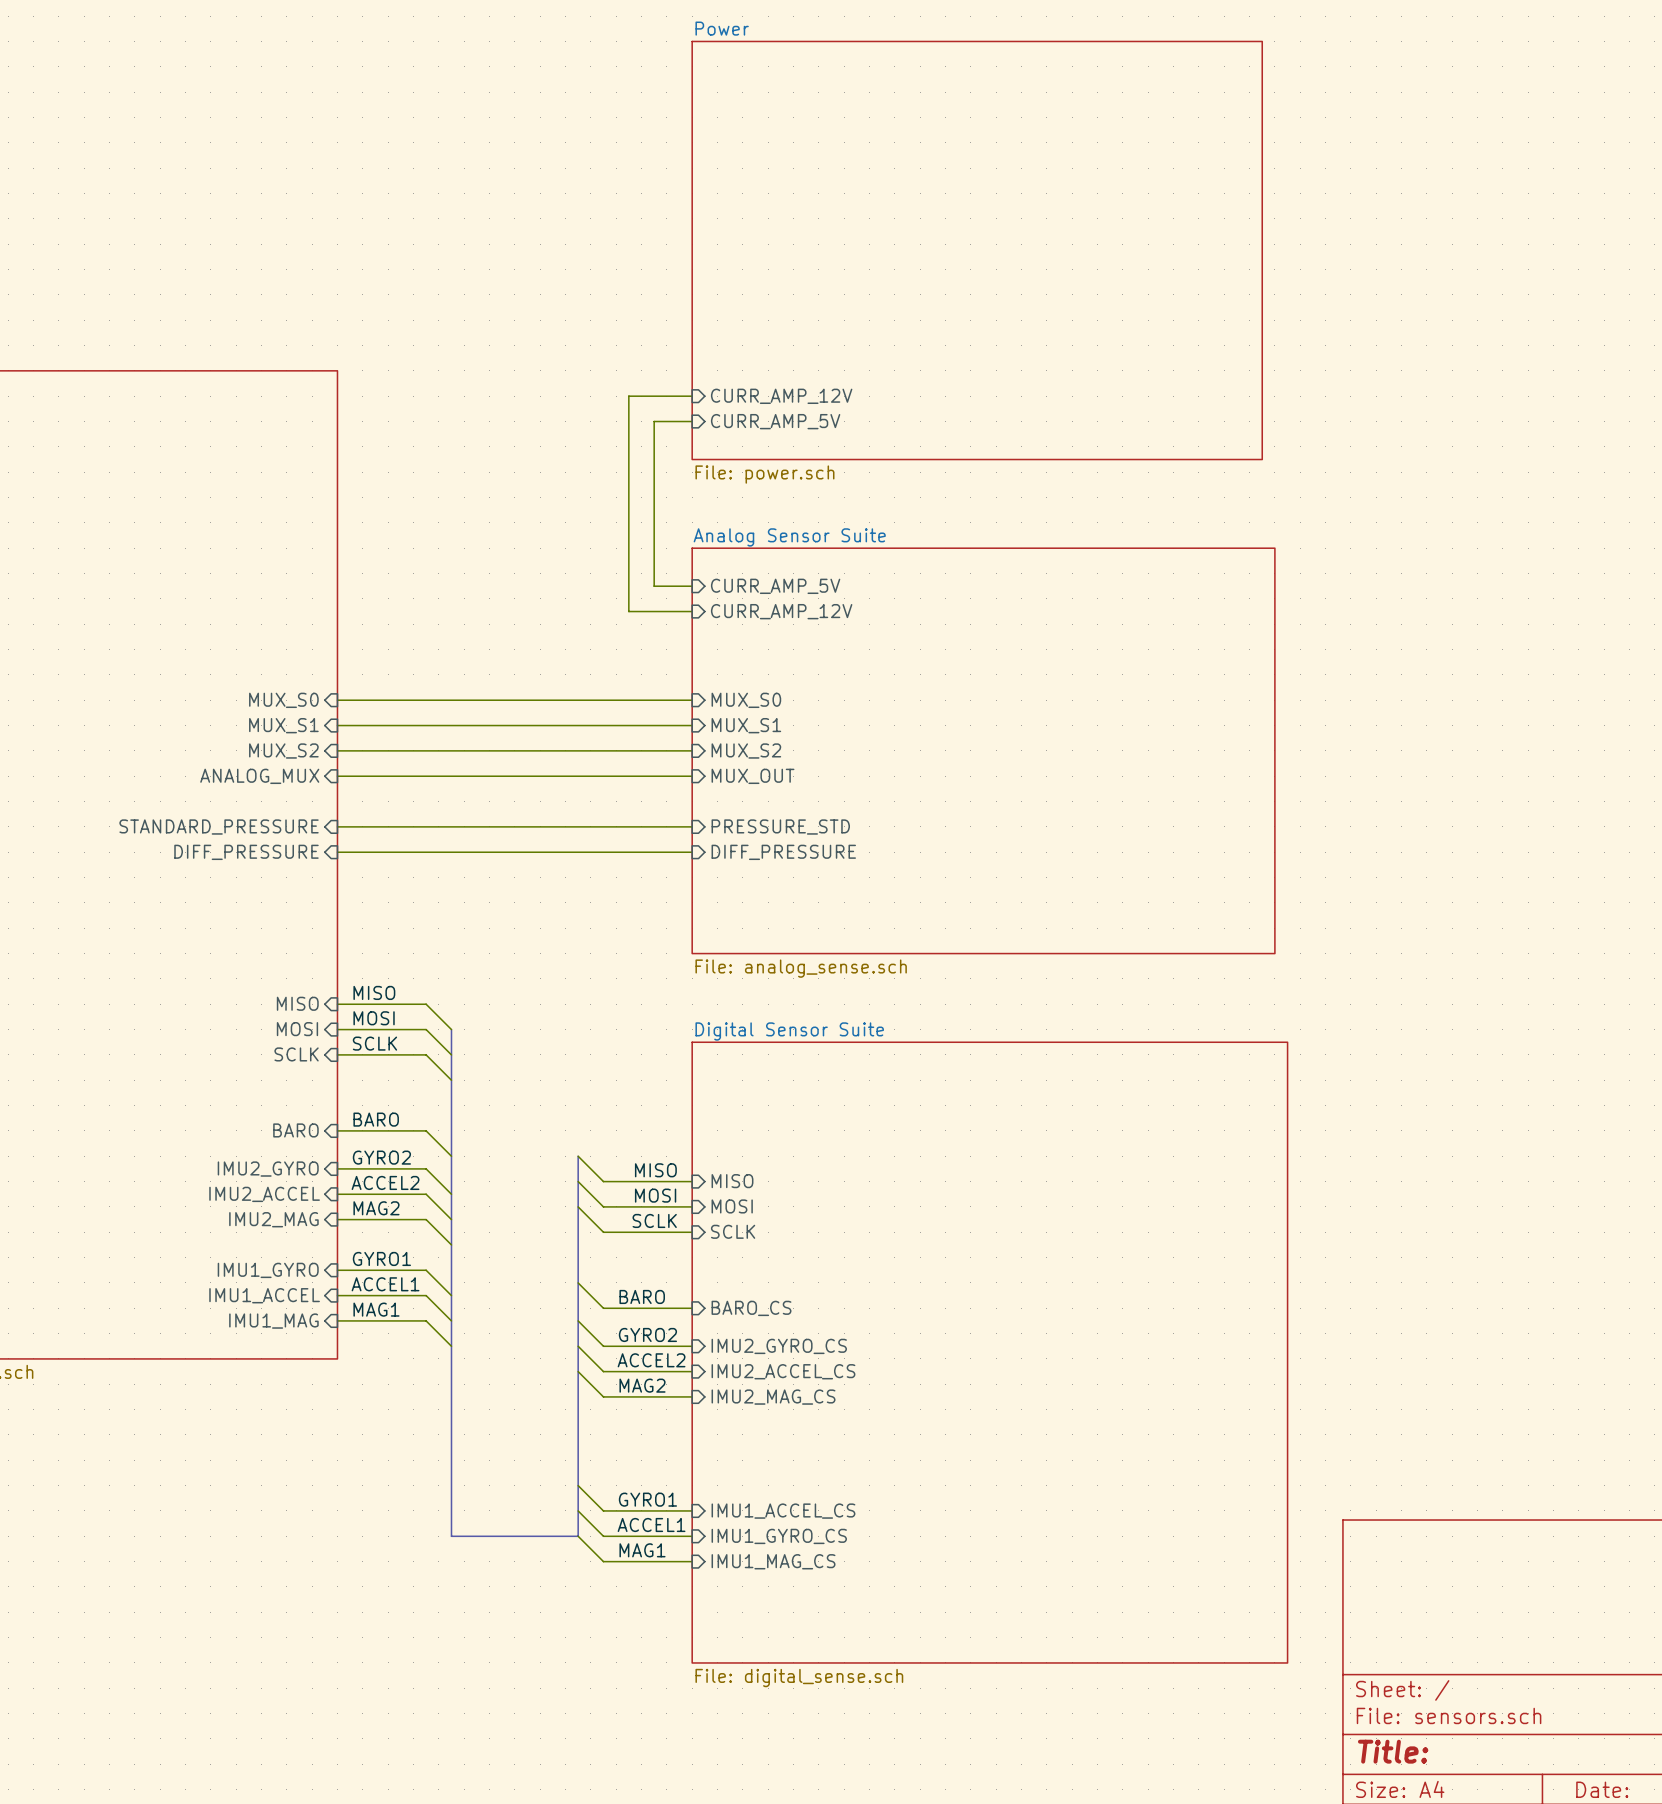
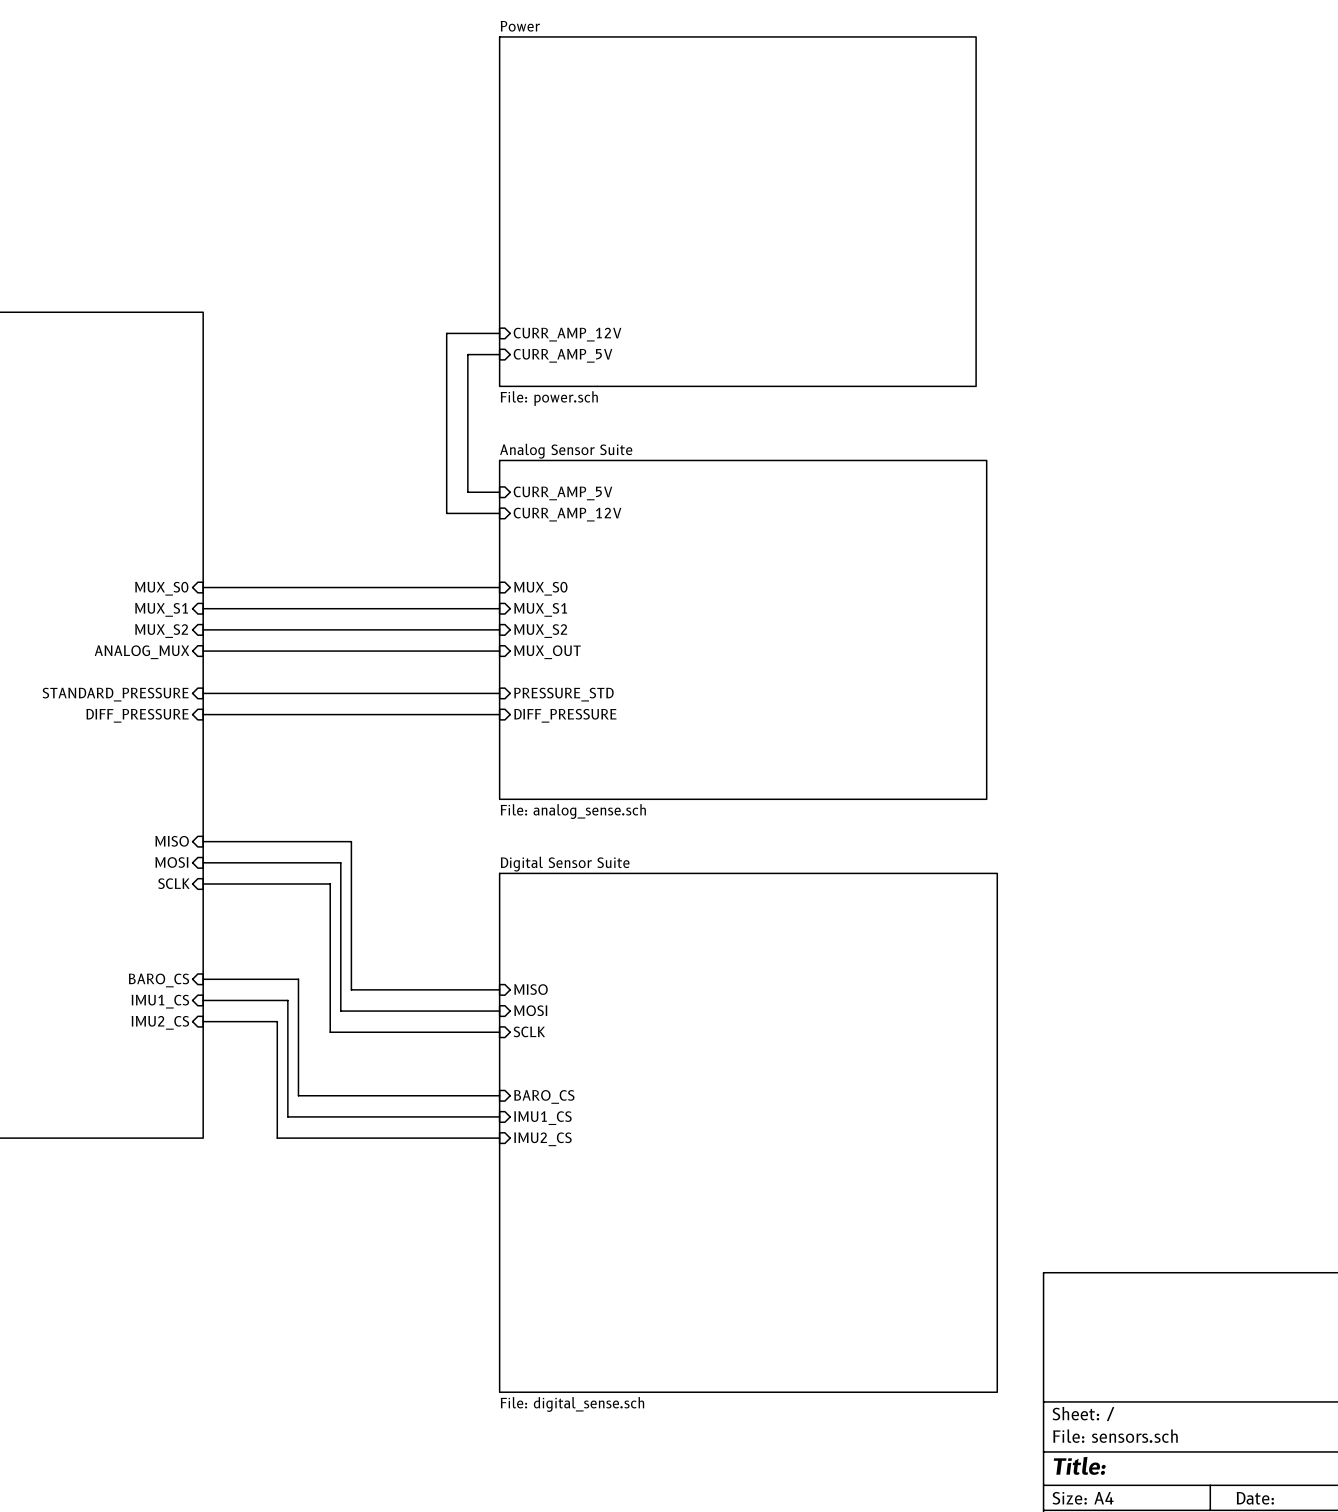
label: MISO (374, 992) -> none
wire: (426, 1004) (451, 1029) -> none
label: MOSI (374, 1018) -> none
wire: (426, 1029) (451, 1054) -> none
bus: (451, 1029) (451, 1536) (578, 1536) (578, 1156) -> none
label: SCLK (374, 1043) -> none
wire: (426, 1054) (451, 1080) -> (277, 884) (330, 884) (330, 1032) (425, 1032)
label: BARO (376, 1119) -> none
sheet pin: BARO (295, 1130) -> none
wire: (337, 1130) (426, 1130) (451, 1156) -> none
wire: (578, 1156) (603, 1181) -> (277, 841) (351, 841) (351, 989) (425, 989)
label: GYRO2 (381, 1157) -> none
wire: (426, 1168) (451, 1194) -> none
sheet pin: IMU2_GYRO (268, 1169) -> BARO_CS (158, 980)
label: MISO (655, 1170) -> none
wire: (578, 1181) (603, 1206) -> (277, 862) (340, 862) (340, 1011) (425, 1011)
label: ACCEL2 (385, 1182) -> none
sheet pin: IMU2_ACCEL (264, 1194) -> IMU1_CS (160, 1001)
wire: (426, 1194) (451, 1219) -> (277, 1000) (287, 1000) (287, 1116) (499, 1116)
label: MOSI (655, 1195) -> none
wire: (578, 1206) (603, 1232) -> none
label: MAG2 (376, 1208) -> none
sheet pin: IMU2_MAG (273, 1219) -> IMU2_CS (160, 1022)
wire: (426, 1219) (451, 1244) -> (277, 1021) (277, 1138) (499, 1138)
label: SCLK (654, 1220) -> none
label: GYRO1 (381, 1258) -> none
sheet pin: IMU1_GYRO (268, 1270) -> none
wire: (337, 1270) (426, 1270) (451, 1295) -> none
wire: (578, 1282) (603, 1308) -> (277, 979) (298, 979) (298, 1095) (425, 1095)
label: ACCEL1 (385, 1284) -> none
sheet pin: IMU1_ACCEL (264, 1295) -> none
wire: (337, 1295) (426, 1295) (451, 1320) -> none
label: BARO (642, 1296) -> none
label: MAG1 (376, 1309) -> none
wire: (337, 1320) (426, 1320) (451, 1346) -> none
wire: (578, 1320) (603, 1346) (692, 1346) -> none
sheet pin: IMU1_MAG (273, 1321) -> none
sheet pin: none -> IMU1_CS (542, 1118)
label: GYRO2 (647, 1334) -> none
wire: (578, 1346) (603, 1371) (692, 1371) -> none
sheet pin: IMU2_GYRO_CS (779, 1346) -> none
sheet pin: none -> IMU2_CS (542, 1139)
label: ACCEL2 (651, 1360) -> none
wire: (578, 1371) (603, 1396) (692, 1396) -> none
sheet pin: IMU2_ACCEL_CS (783, 1371) -> none
label: MAG2 (642, 1385) -> none
sheet pin: IMU2_MAG_CS (773, 1397) -> none
wire: (578, 1485) (603, 1510) (692, 1510) -> none
label: GYRO1 (647, 1499) -> none
wire: (578, 1510) (603, 1536) (692, 1536) -> none
sheet pin: IMU1_ACCEL_CS (783, 1511) -> none
label: ACCEL1 (651, 1524) -> none
wire: (578, 1536) (603, 1561) (692, 1561) -> none
sheet pin: IMU1_GYRO_CS (779, 1536) -> none
label: MAG1 (642, 1550) -> none
sheet pin: IMU1_MAG_CS (773, 1561) -> none

